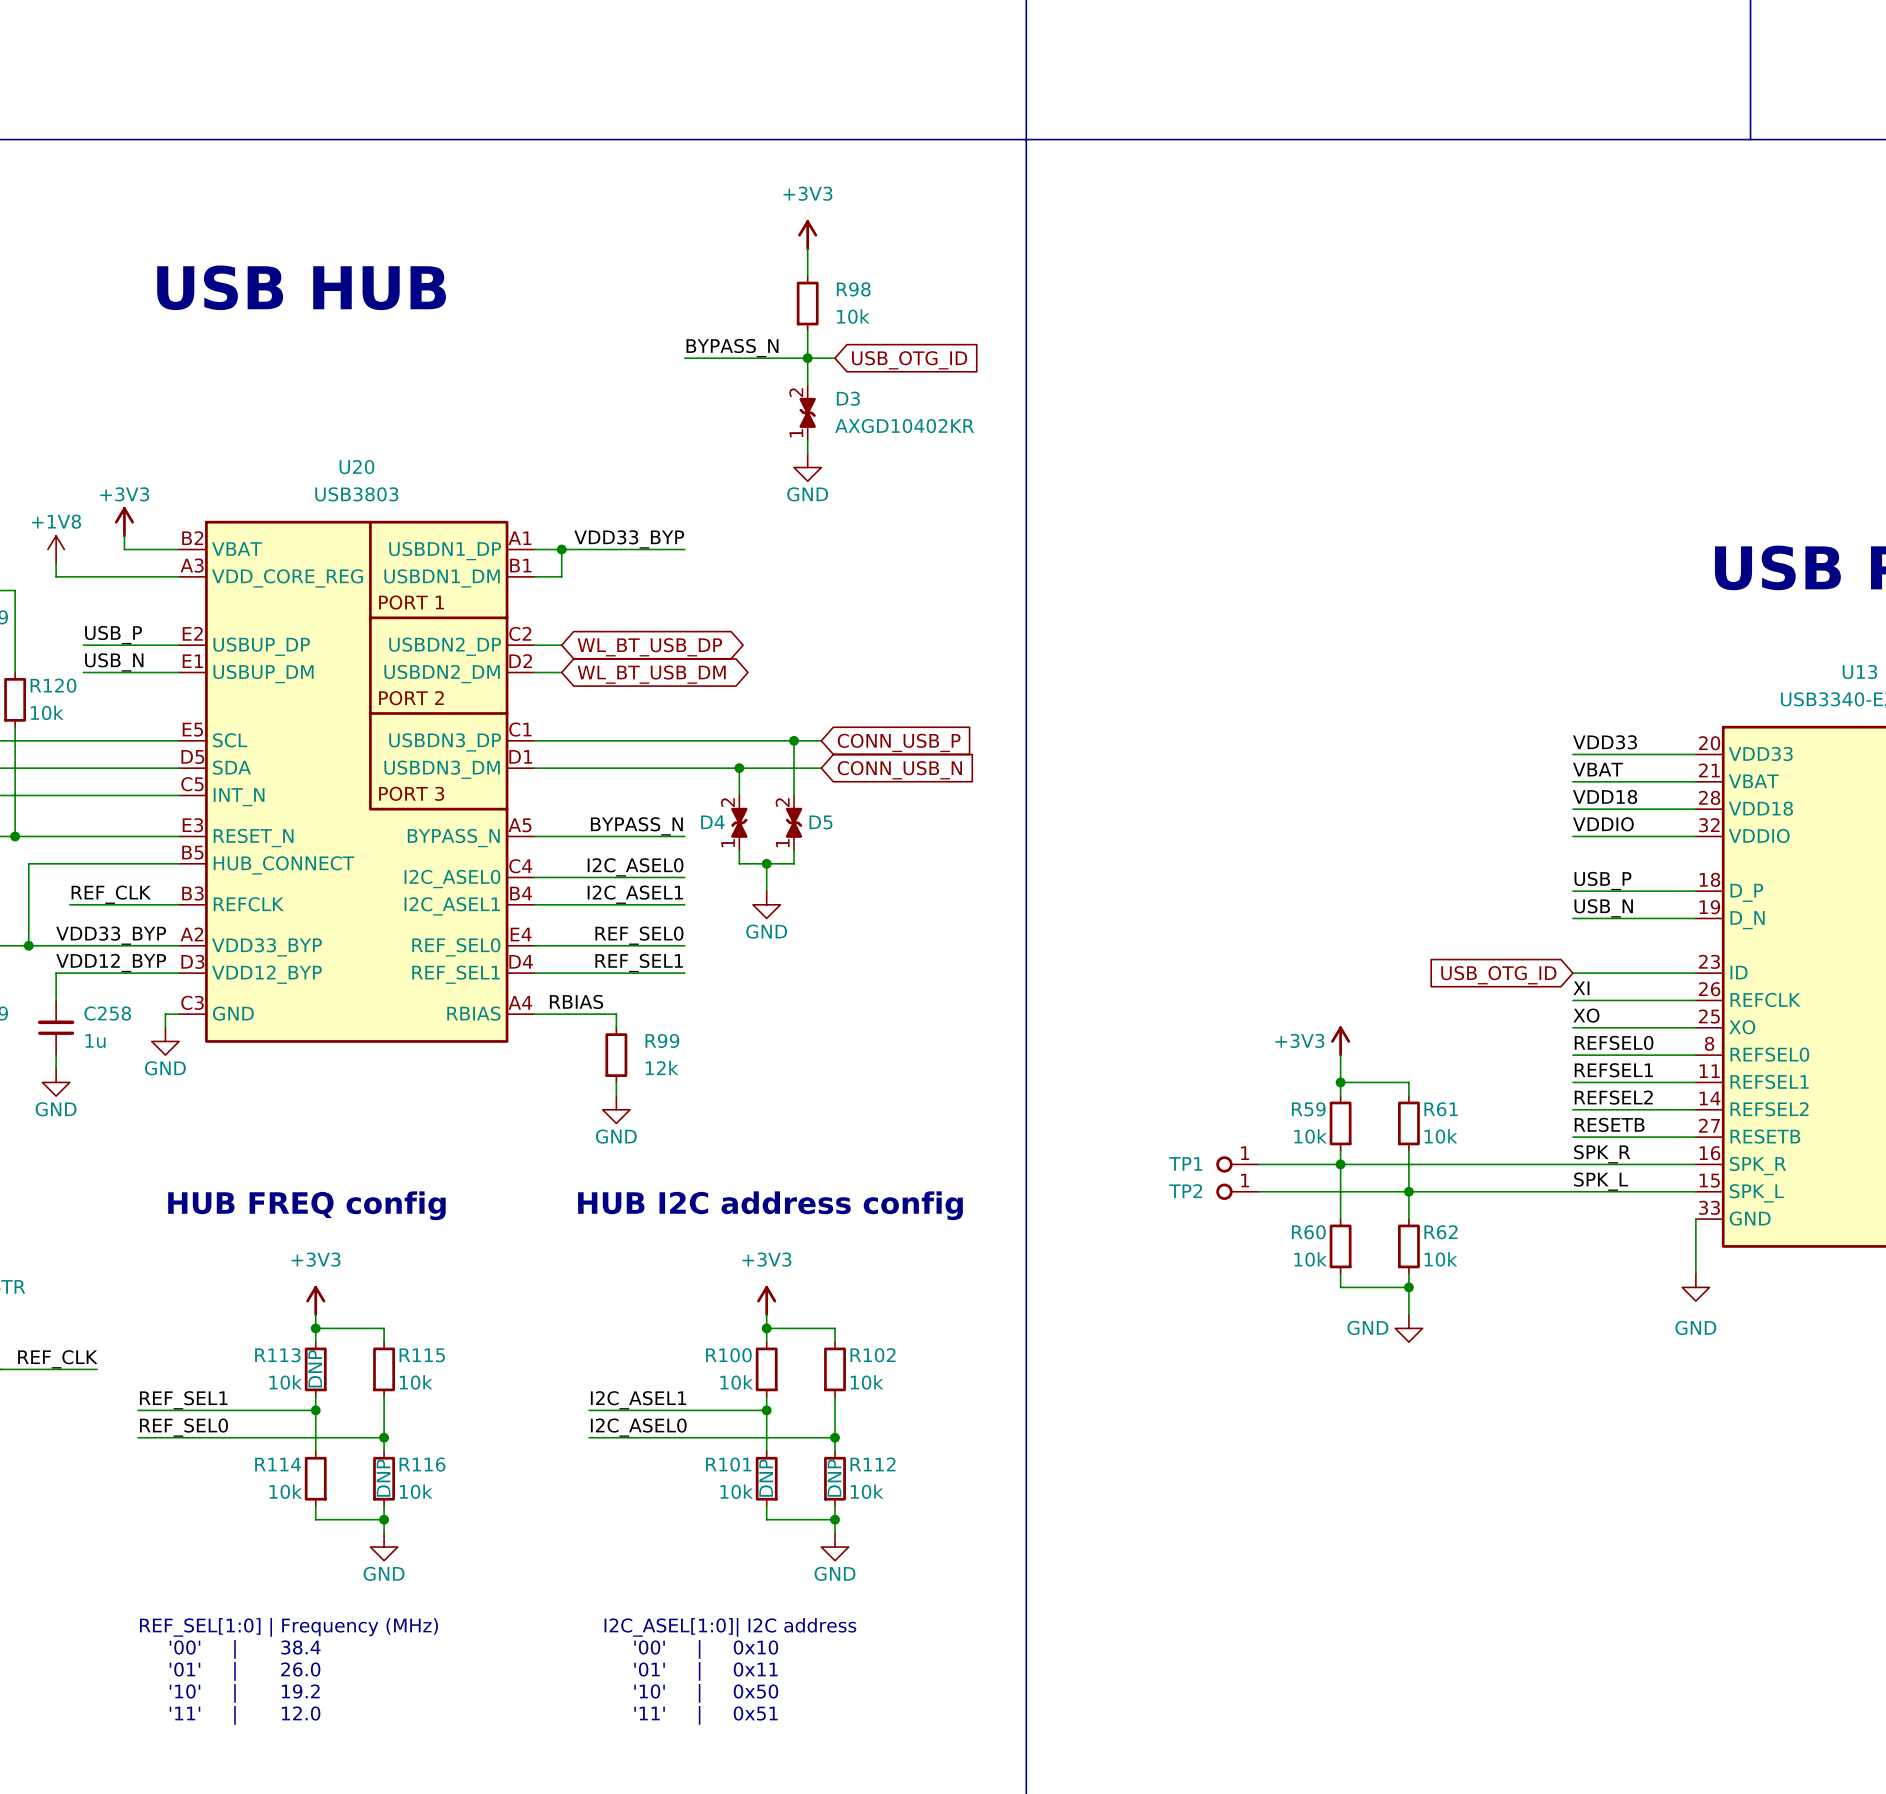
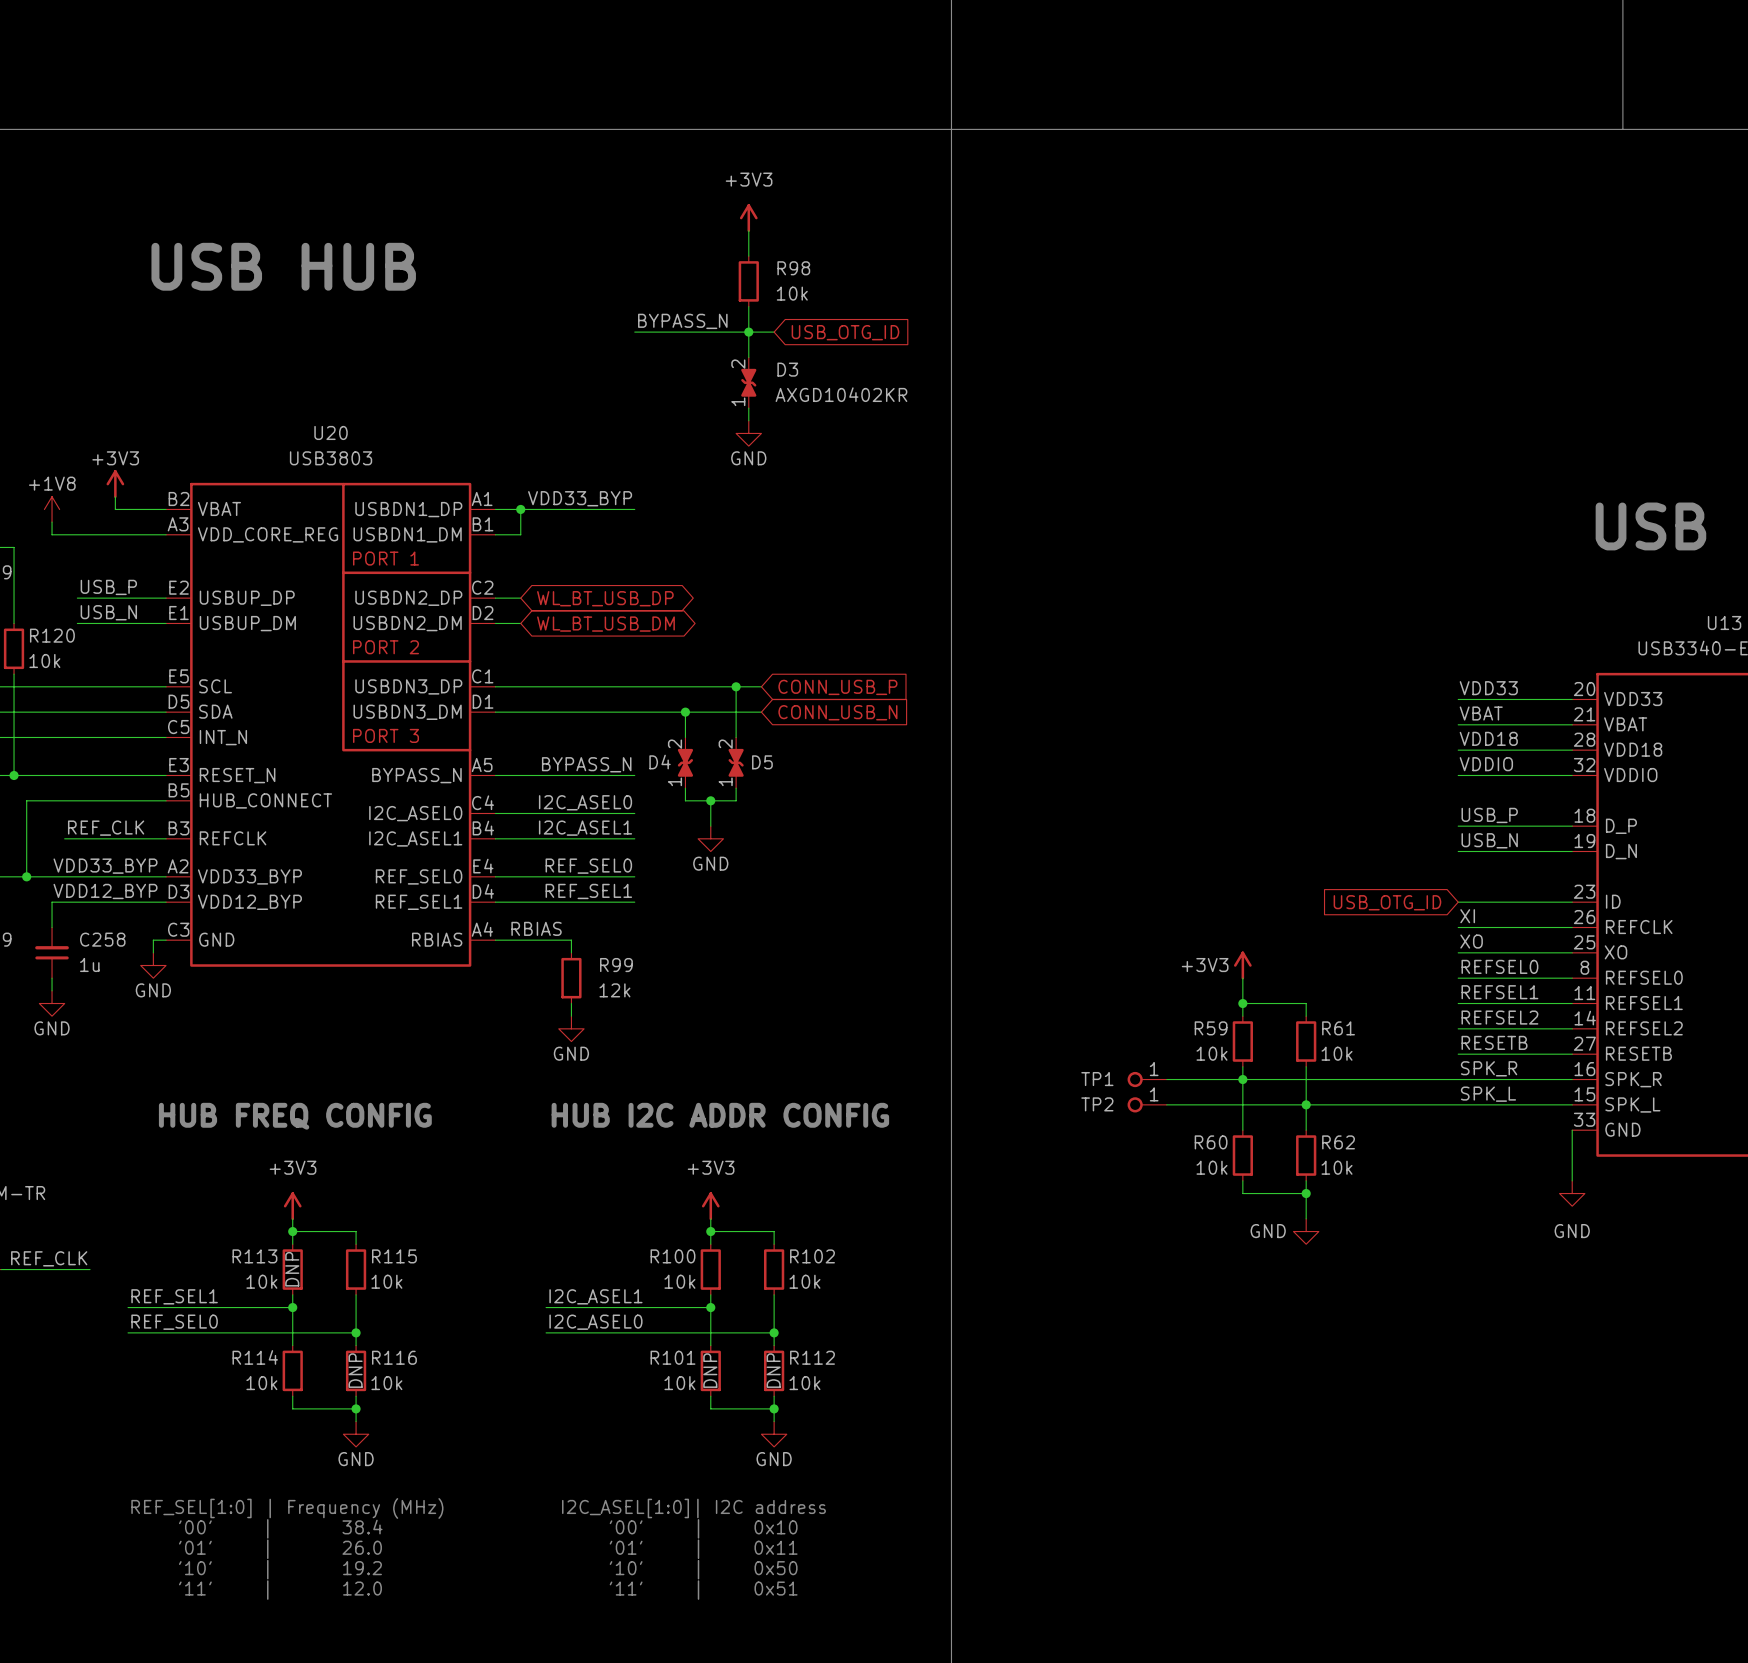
text: none -> HUB I2C ADDR CONFIG (720, 1115)
text: HUB FREQ config (306, 1205) -> HUB FREQ CONFIG (295, 1116)
text: HUB I2C address config (770, 1205) -> none

